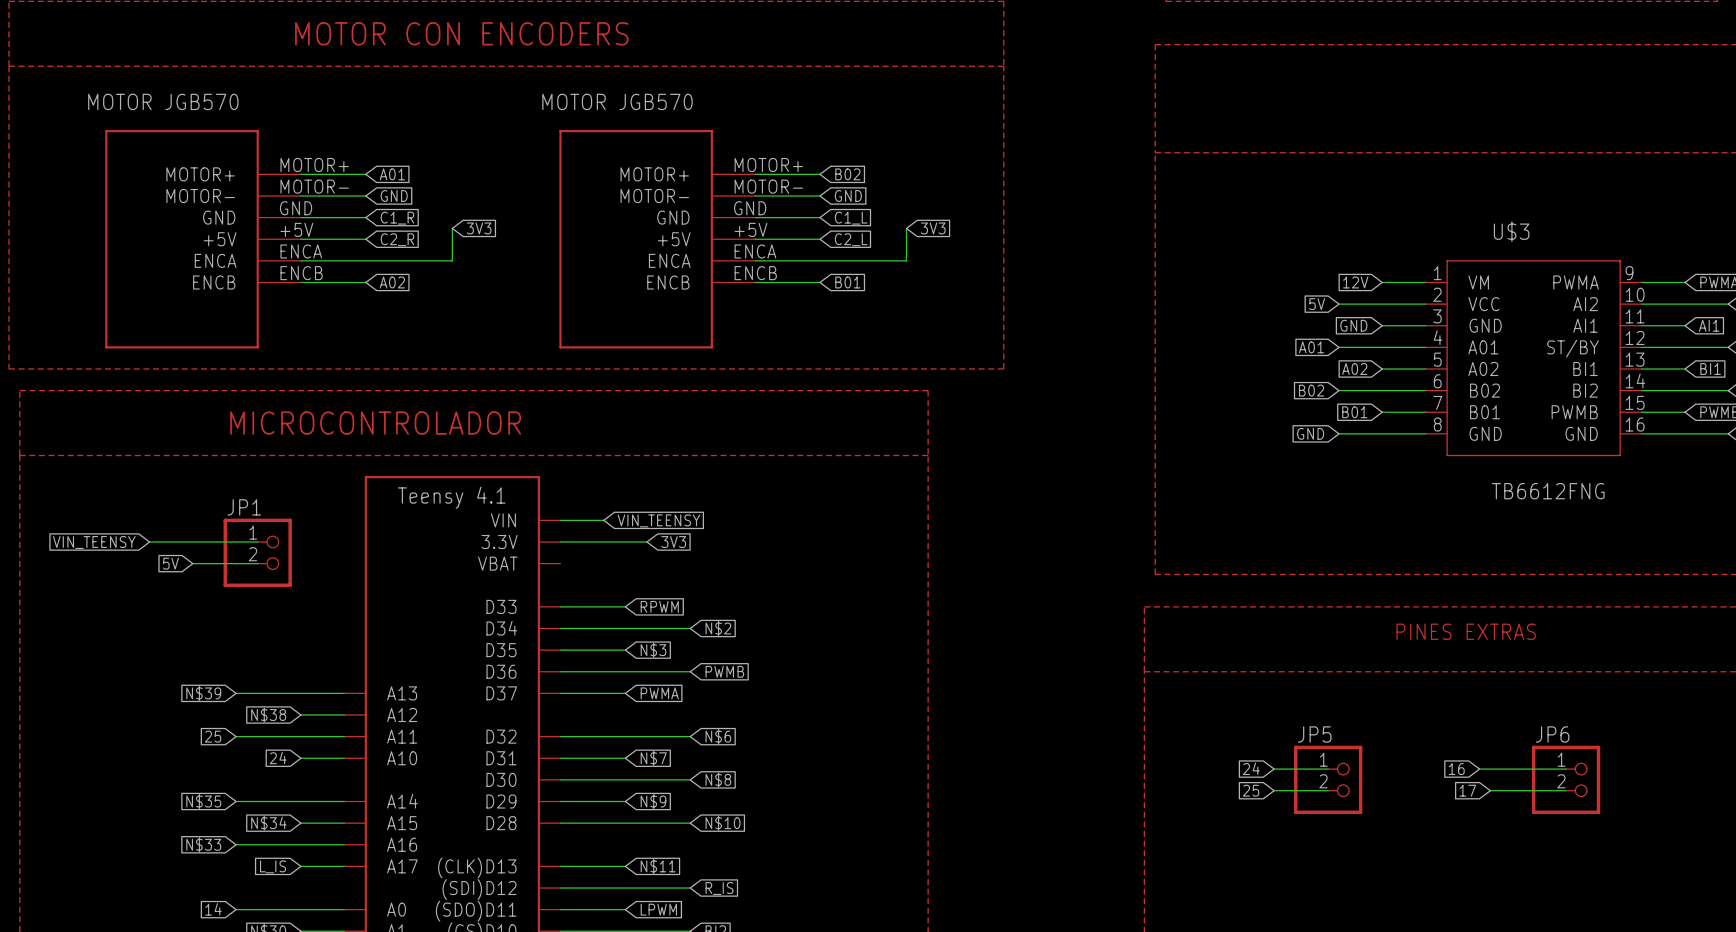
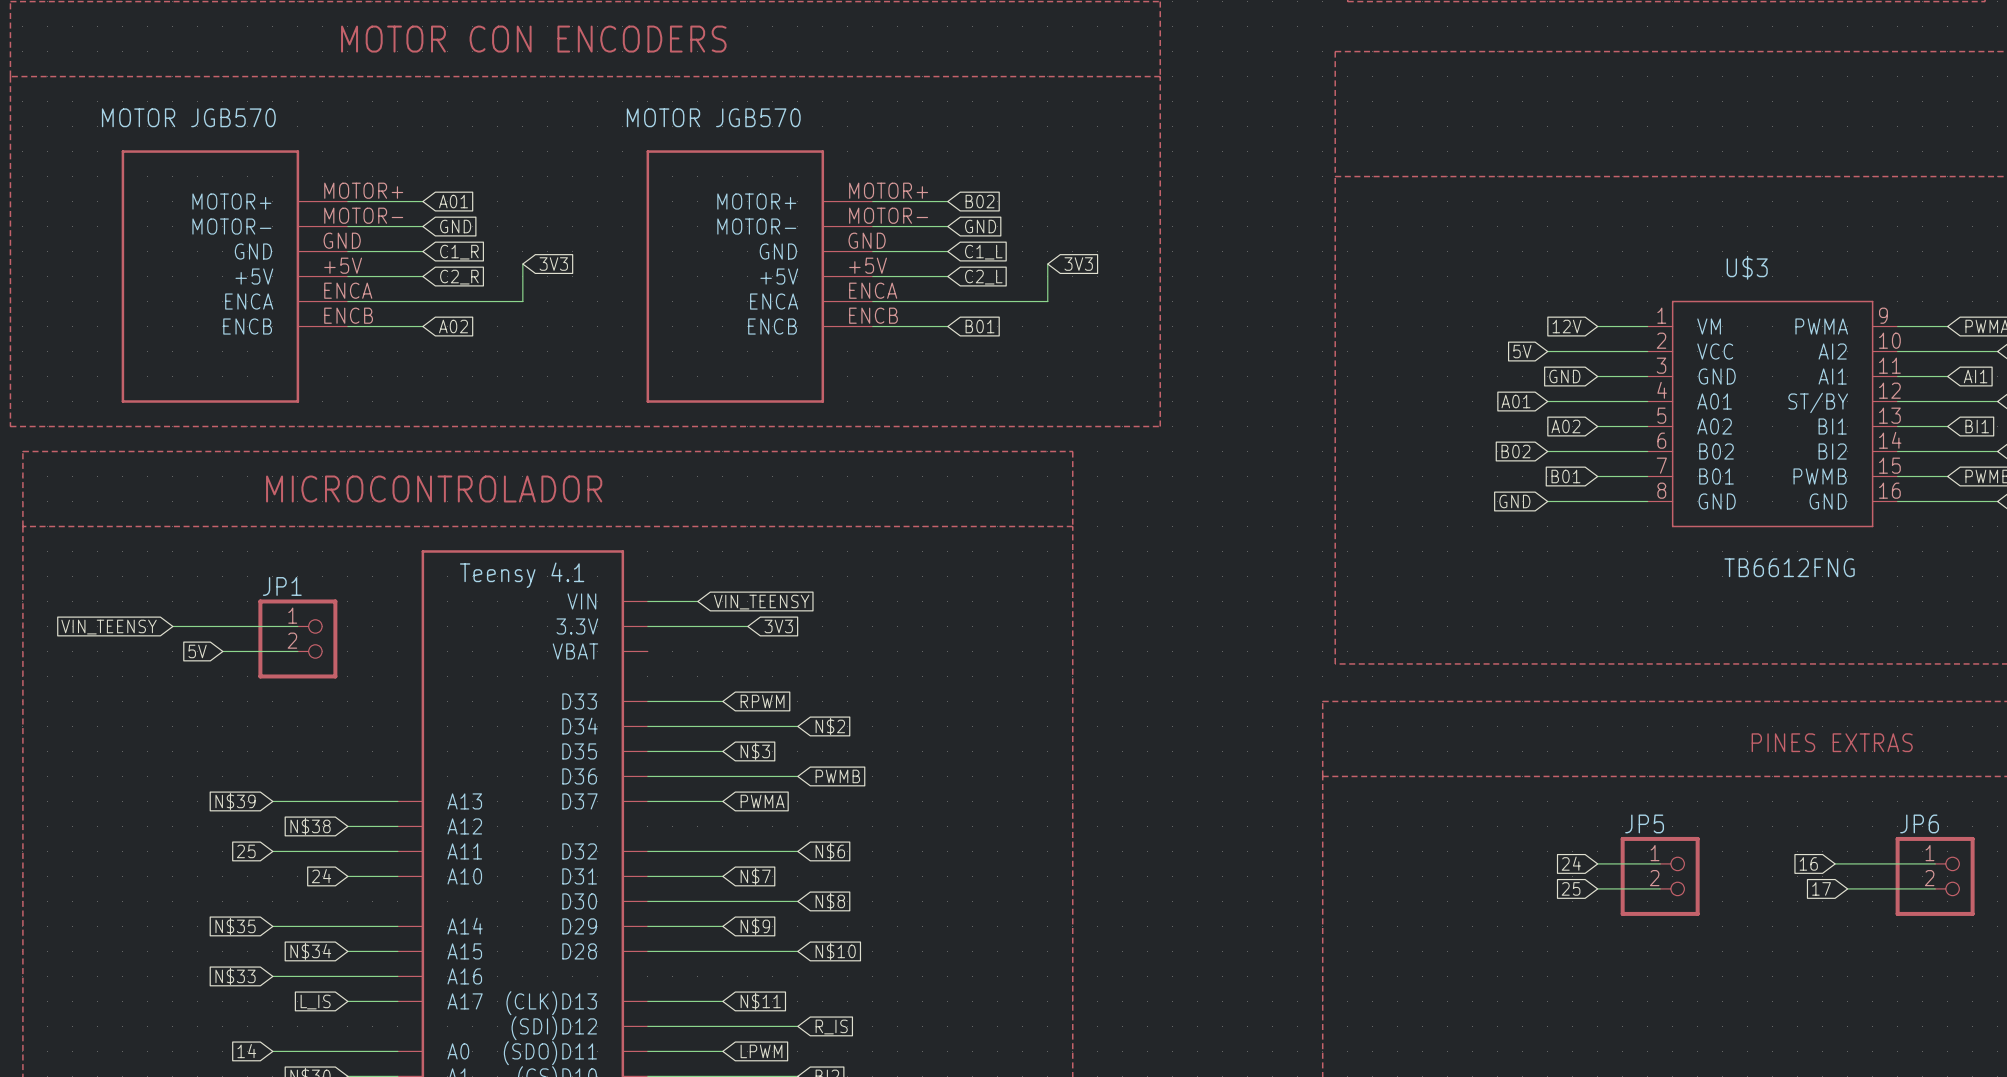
text position: PINES EXTRAS (1466, 631) -> PINES EXTRAS (1832, 742)
global label position: 24 (1251, 768) -> 24 (1571, 863)
wire: (1274, 769) (1328, 769) -> (1597, 888) (1660, 888)
global label position: 16 (1456, 769) -> 16 (1808, 863)
wire: (1479, 769) (1566, 769) -> (1835, 863) (1935, 863)
JP5 position: (1328, 779) -> (1660, 876)
JP6 position: (1566, 779) -> (1935, 876)
global label position: 25 (1251, 790) -> 25 (1571, 888)
wire: (1274, 790) (1328, 790) -> (1597, 863) (1660, 863)
global label position: 17 (1467, 790) -> 17 (1821, 888)
wire: (1490, 790) (1566, 790) -> (1847, 888) (1935, 888)

